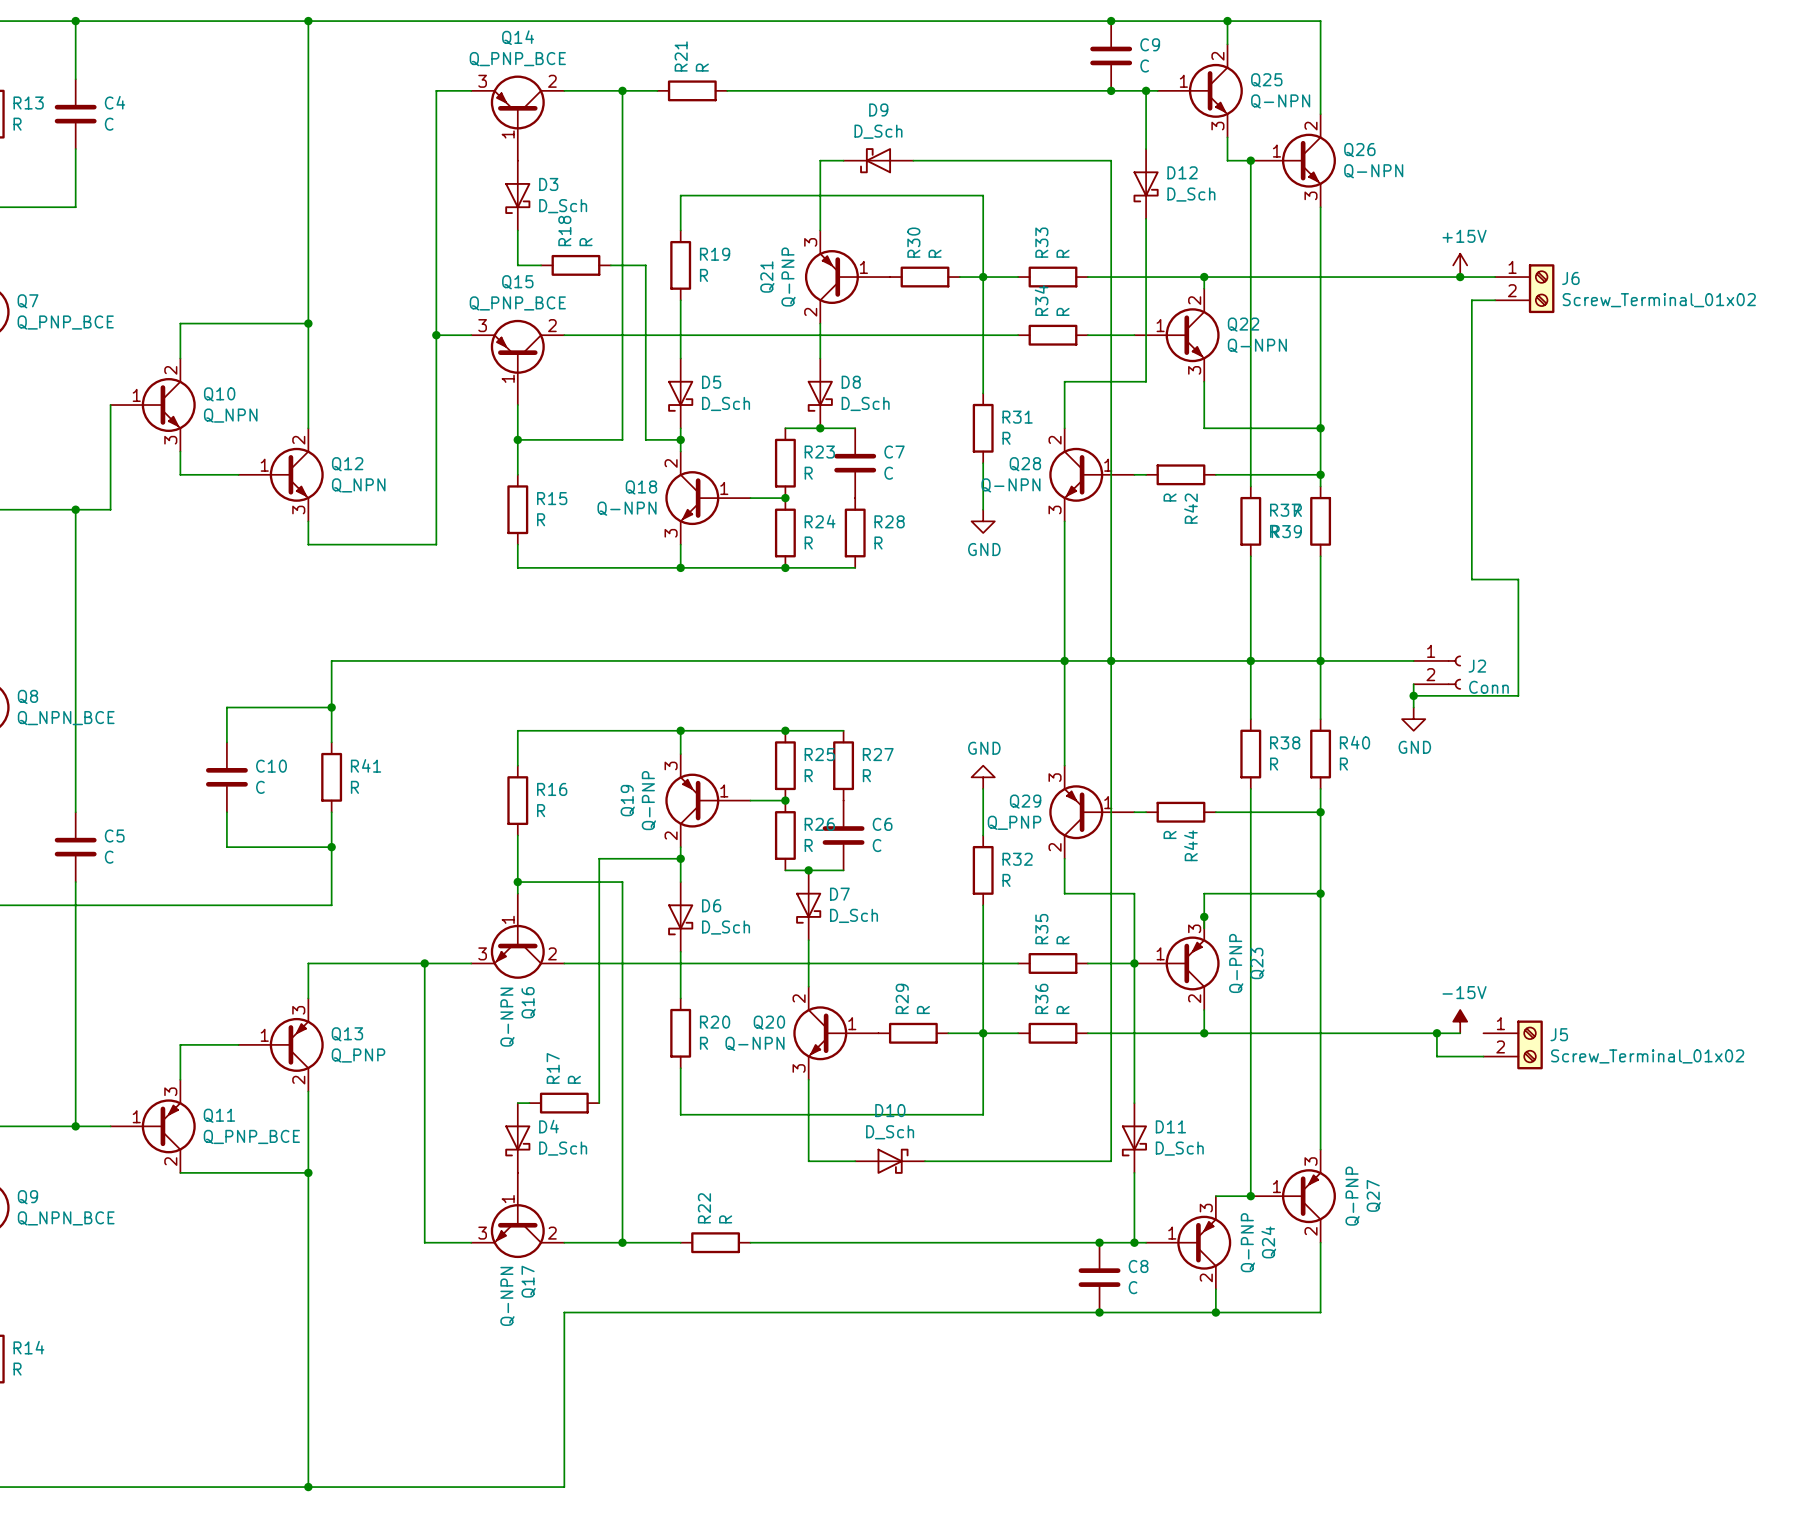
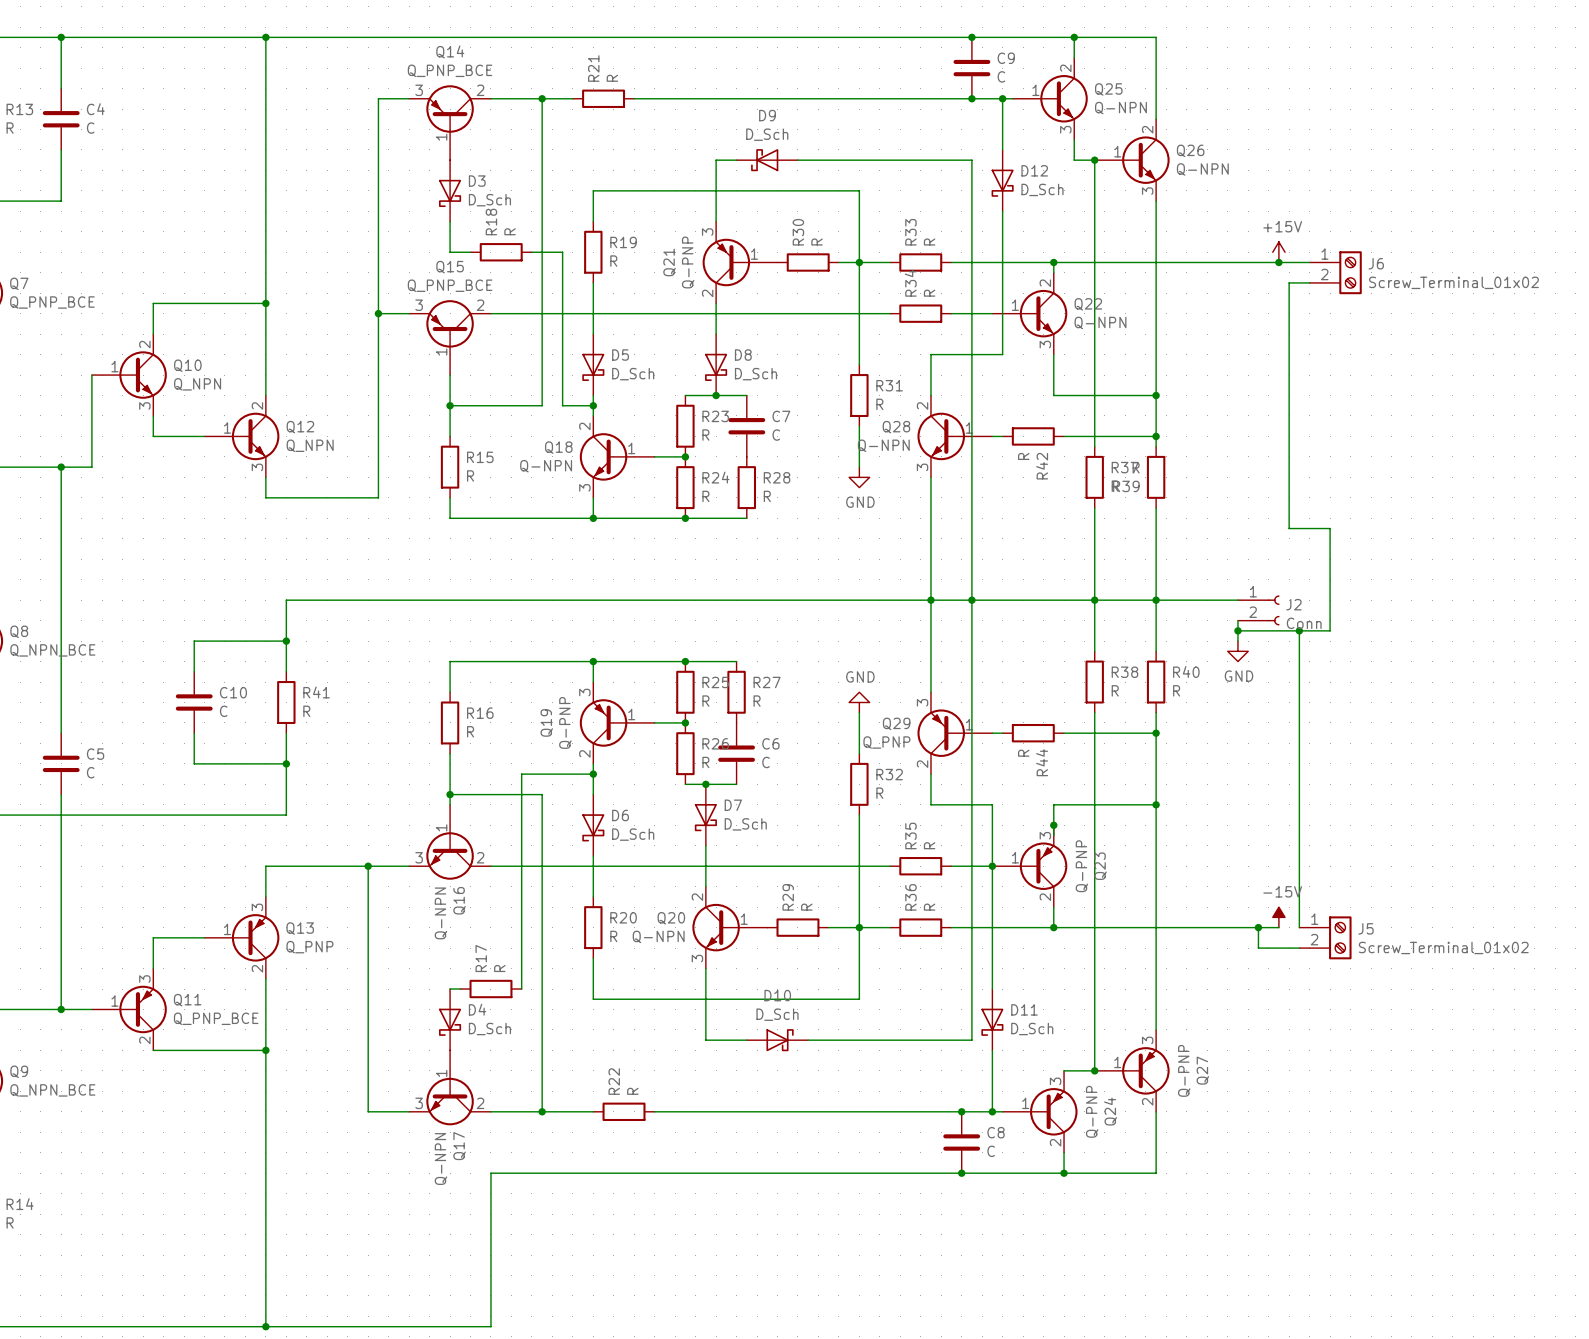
wire: none -> (1299, 630) (1299, 927)
junction: none -> (1299, 630)

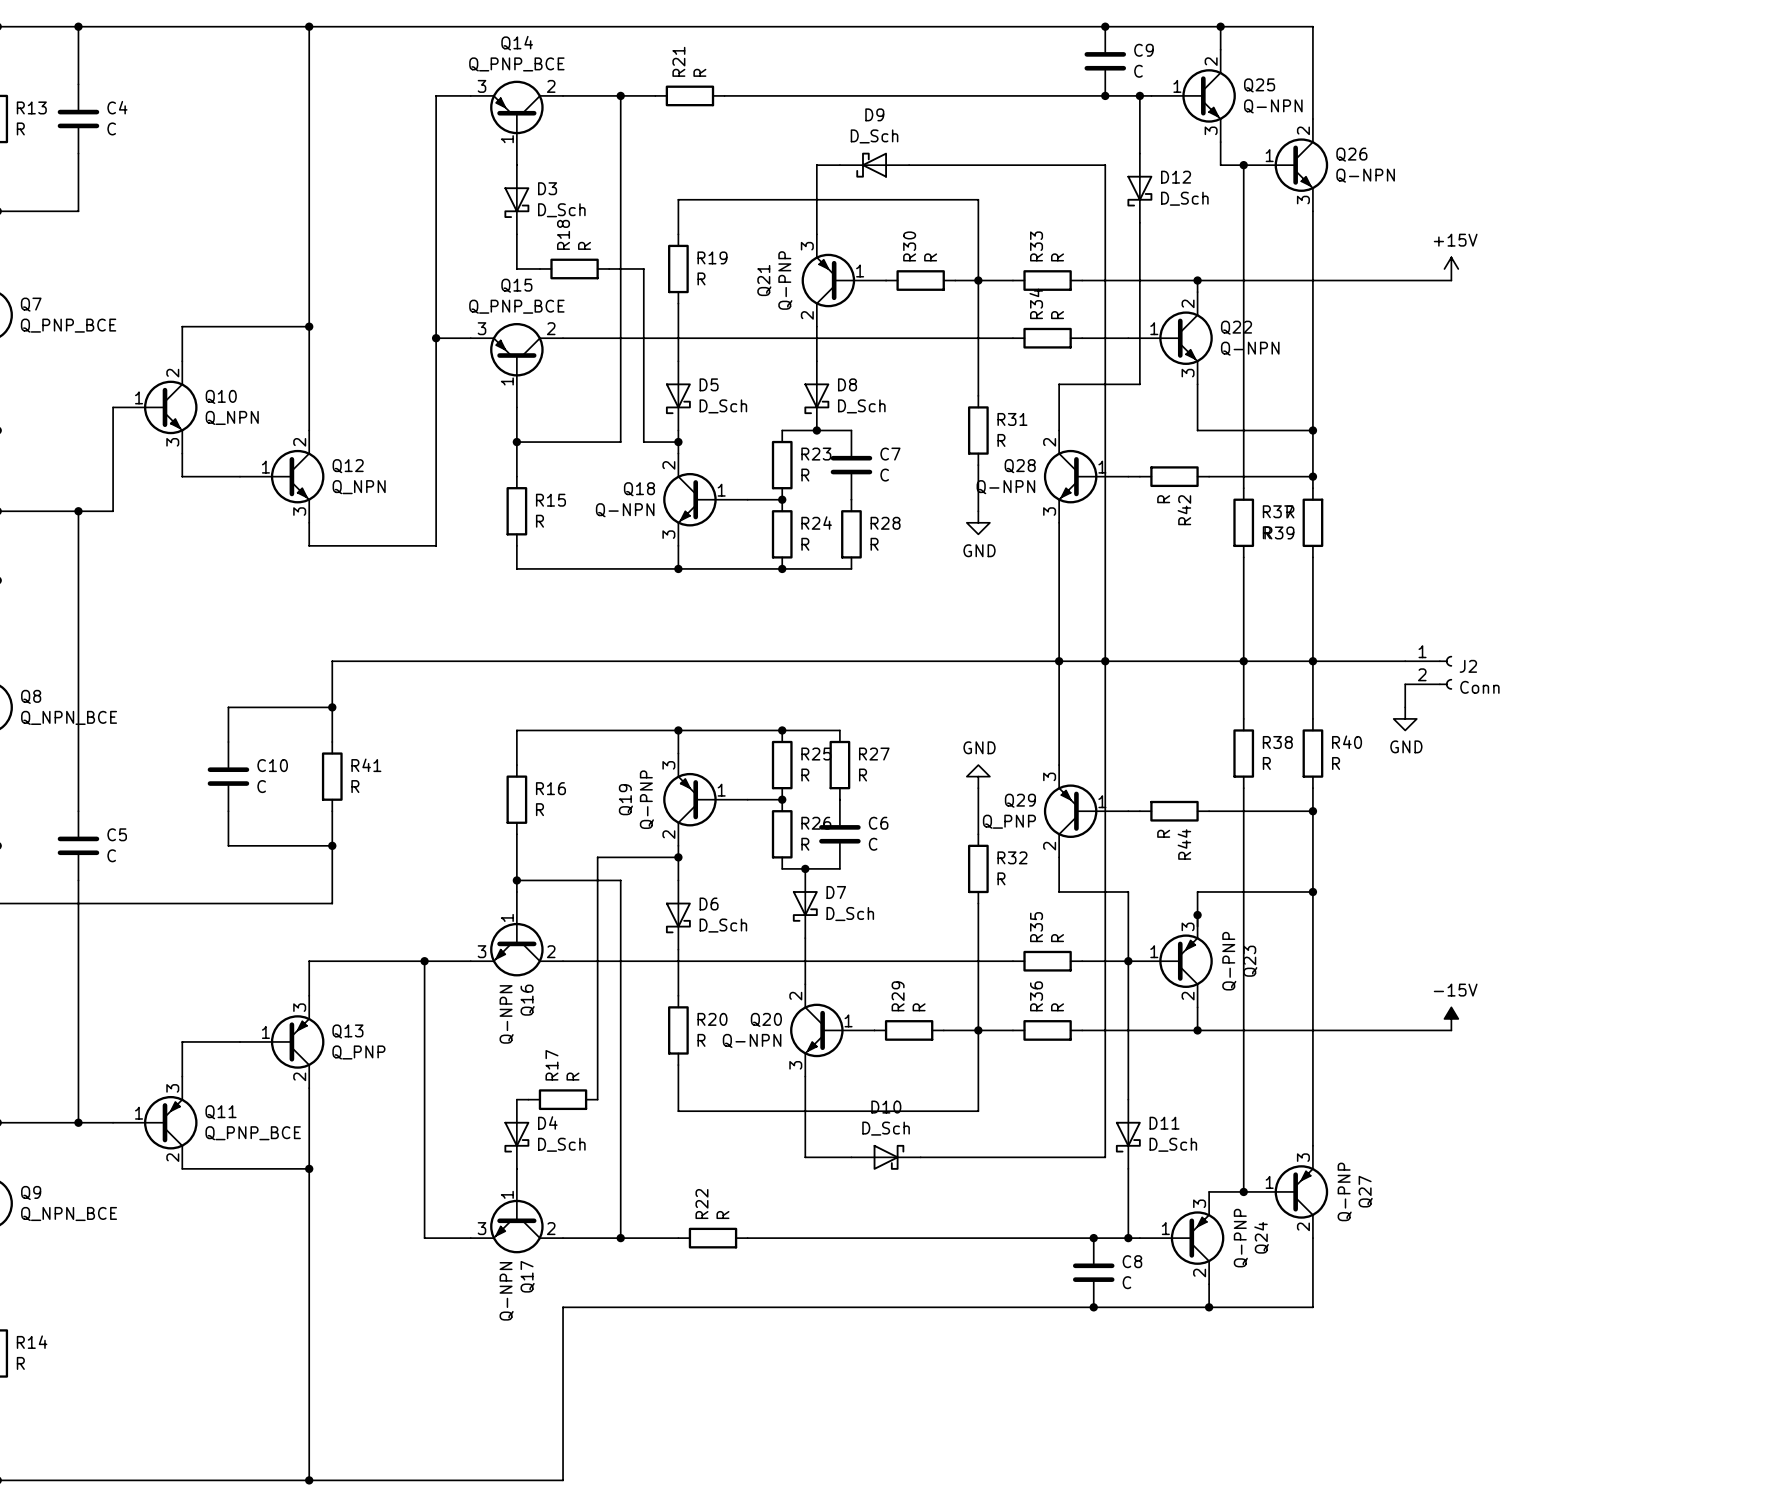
wire: (1278, 262) (1309, 262) -> none
junction: (1278, 262) -> none
J6: Screw_Terminal_01x02 (1335, 272) -> none
wire: (1309, 282) (1289, 282) (1289, 528) (1330, 528) (1330, 630) (1237, 630) -> none
junction: (1237, 630) -> none
wire: (1299, 630) (1299, 927) -> none
junction: (1299, 630) -> none
wire: (1258, 927) (1258, 948) (1299, 948) -> none
junction: (1258, 927) -> none
J5: Screw_Terminal_01x02 (1325, 937) -> none

